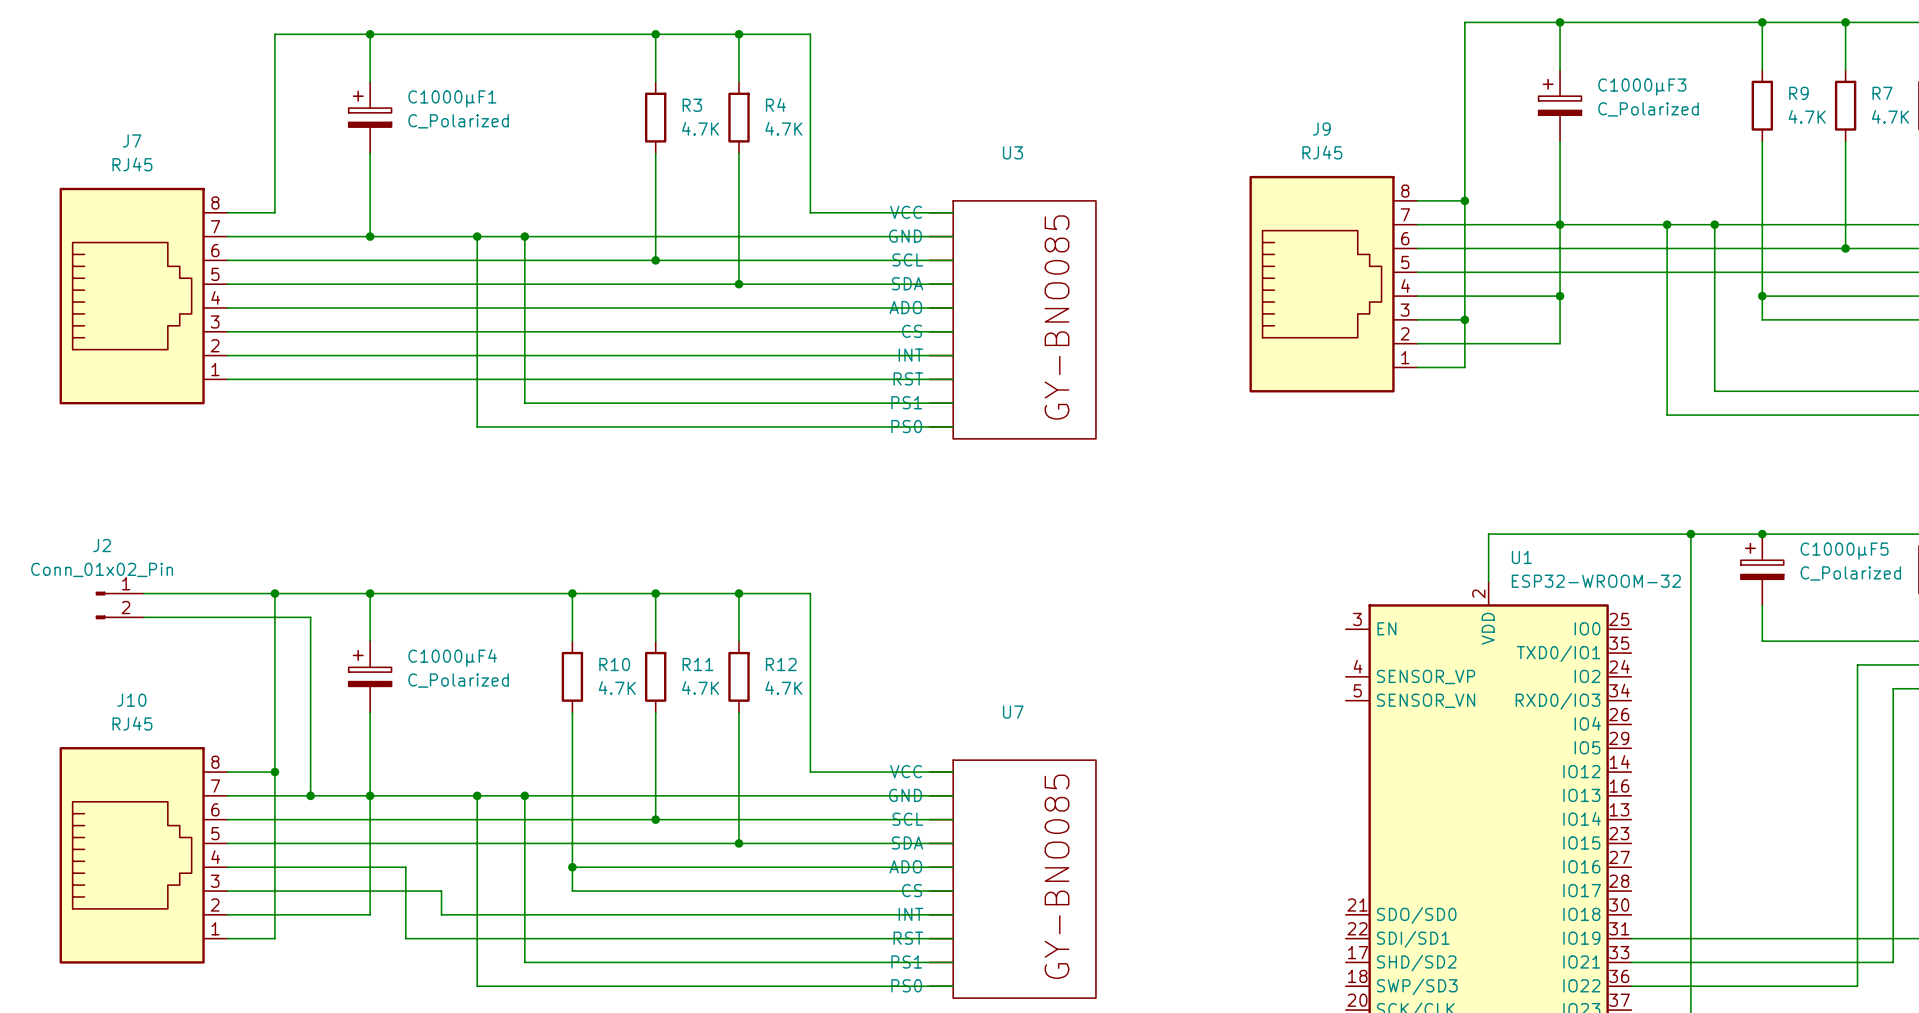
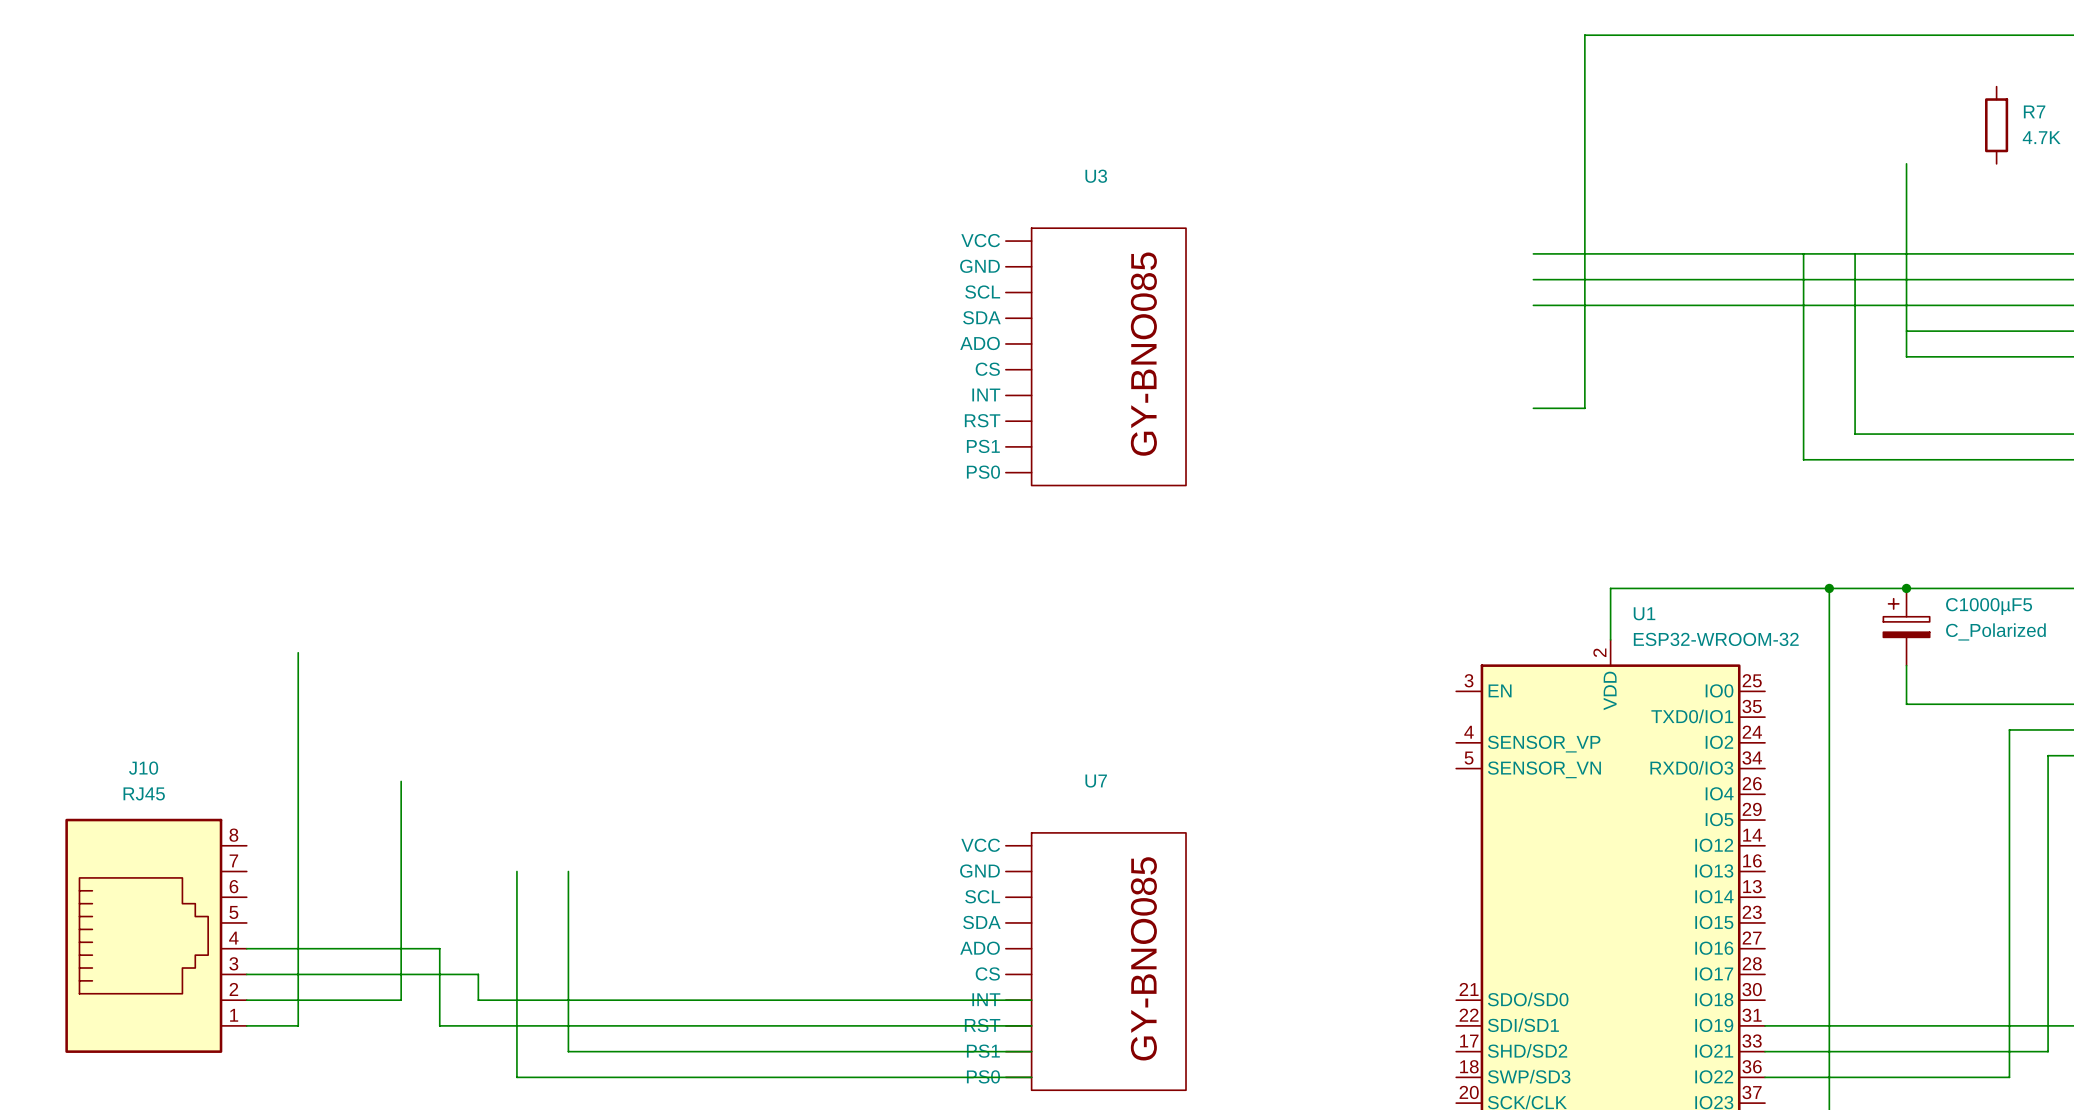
wire: (1560, 22) (1560, 70) -> none
junction: (1560, 22) -> none
wire: (1762, 22) (1762, 70) -> none
junction: (1762, 22) -> none
wire: (1845, 22) (1845, 70) -> none
junction: (1845, 22) -> none
wire: (370, 34) (370, 81) -> none
junction: (370, 34) -> none
wire: (655, 34) (655, 81) -> none
junction: (655, 34) -> none
wire: (738, 34) (738, 81) -> none
junction: (738, 34) -> none
C1000µF3: C_Polarized (1560, 105) -> none
R9: 4.7K (1762, 105) -> none
C1000µF1: C_Polarized (370, 117) -> none
R3: 4.7K (655, 117) -> none
R4: 4.7K (738, 117) -> none
wire: (1560, 141) (1560, 343) (1417, 343) -> none
wire: (1845, 141) (1845, 248) -> none
wire: (370, 153) (370, 236) -> none
wire: (655, 153) (655, 260) -> none
wire: (738, 153) (738, 284) -> none
wire: (1417, 200) (1464, 200) -> none
junction: (1464, 200) -> none
wire: (227, 212) (274, 212) (274, 34) (810, 34) (810, 212) (953, 212) -> none
junction: (1560, 224) -> none
junction: (1667, 224) -> none
junction: (1714, 224) -> none
wire: (227, 236) (953, 236) -> none
junction: (370, 236) -> none
wire: (477, 236) (477, 426) (953, 426) -> none
junction: (477, 236) -> none
wire: (524, 236) (524, 403) (953, 403) -> none
junction: (524, 236) -> none
junction: (1845, 248) -> none
wire: (227, 260) (953, 260) -> none
junction: (655, 260) -> none
wire: (227, 284) (953, 284) -> none
junction: (738, 284) -> none
J9: RJ45 (1333, 284) -> none
J7: RJ45 (143, 296) -> none
wire: (1417, 296) (1560, 296) -> none
junction: (1560, 296) -> none
junction: (1762, 296) -> none
wire: (227, 307) (953, 307) -> none
wire: (1417, 319) (1464, 319) -> none
junction: (1464, 319) -> none
wire: (227, 331) (953, 331) -> none
wire: (227, 355) (953, 355) -> none
wire: (227, 379) (953, 379) -> none
wire: (144, 593) (810, 593) (810, 772) (953, 772) -> none
junction: (274, 593) -> none
wire: (370, 593) (370, 641) -> none
junction: (370, 593) -> none
wire: (572, 593) (572, 641) -> none
junction: (572, 593) -> none
wire: (655, 593) (655, 641) -> none
junction: (655, 593) -> none
wire: (738, 593) (738, 641) -> none
junction: (738, 593) -> none
J2: Conn_01x02_Pin (119, 605) -> none
wire: (144, 617) (310, 617) (310, 795) -> none
C1000µF4: C_Polarized (370, 676) -> none
R10: 4.7K (572, 676) -> none
R11: 4.7K (655, 676) -> none
R12: 4.7K (738, 676) -> none
wire: (572, 712) (572, 891) (953, 891) -> none
wire: (655, 712) (655, 819) -> none
wire: (738, 712) (738, 843) -> none
wire: (227, 772) (274, 772) -> none
junction: (274, 772) -> none
wire: (227, 795) (953, 795) -> none
junction: (310, 795) -> none
junction: (370, 795) -> none
junction: (477, 795) -> none
junction: (524, 795) -> none
wire: (227, 819) (953, 819) -> none
junction: (655, 819) -> none
wire: (227, 843) (953, 843) -> none
junction: (738, 843) -> none
wire: (572, 867) (953, 867) -> none
junction: (572, 867) -> none

